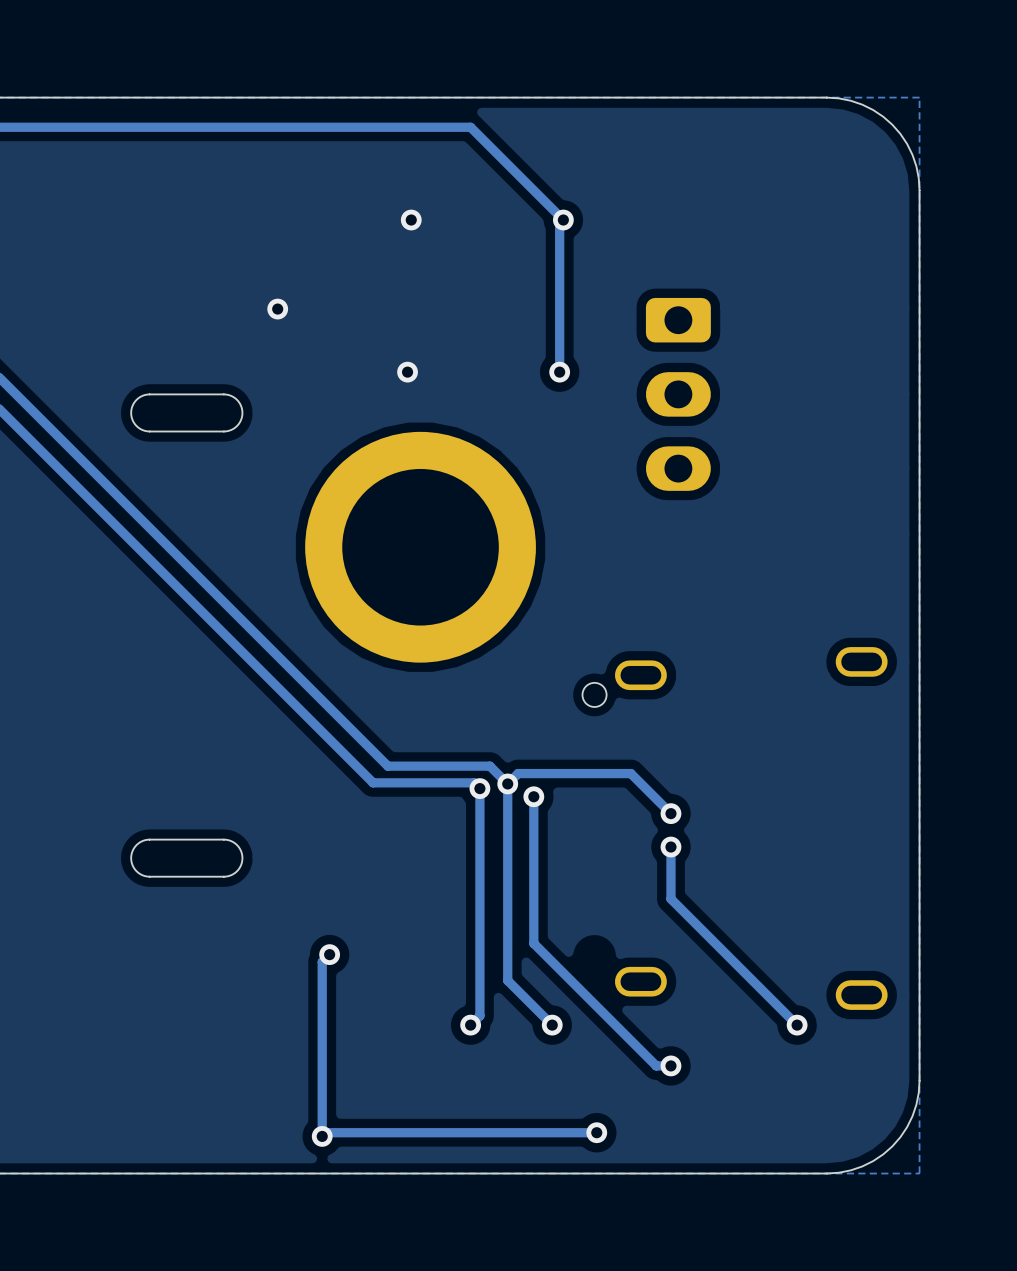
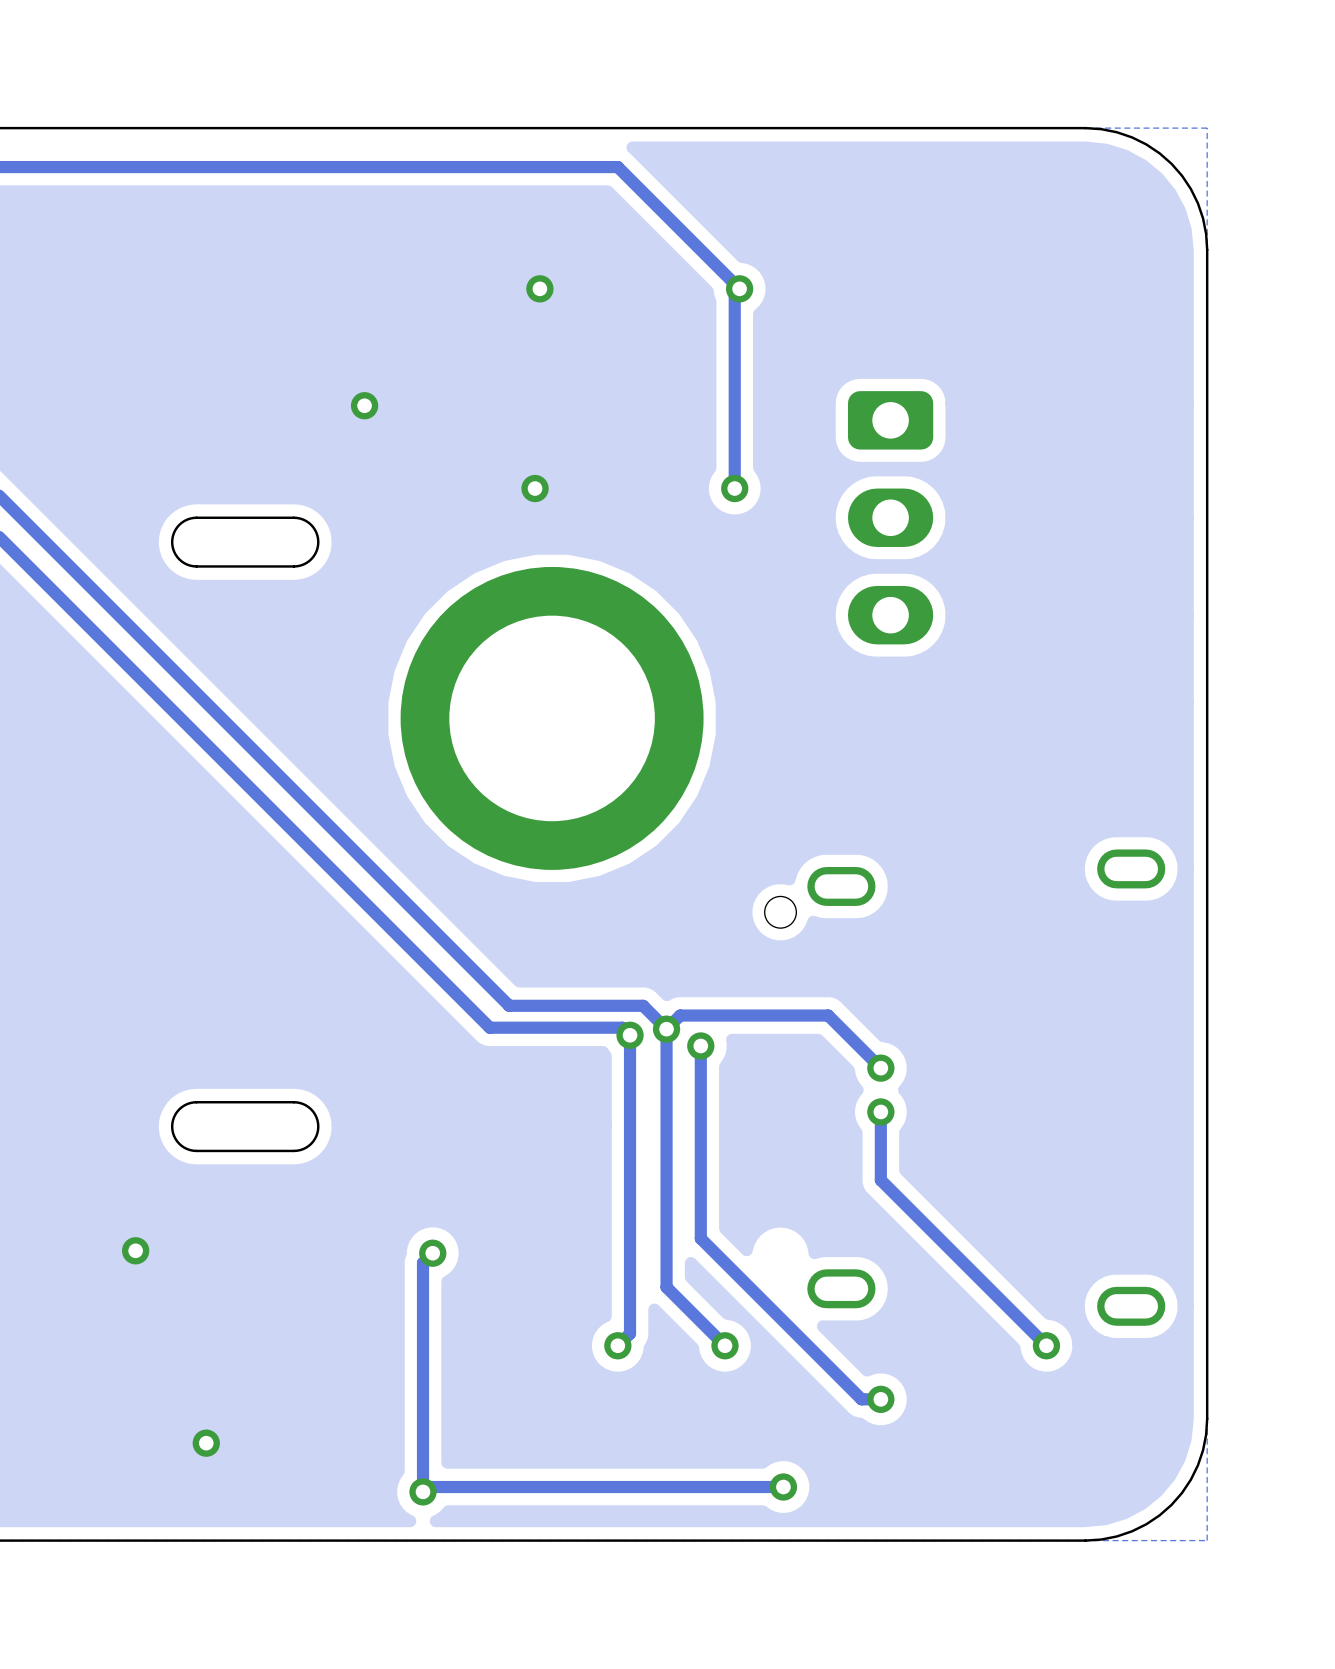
via: none -> (135, 1250)
via: none -> (206, 1443)

